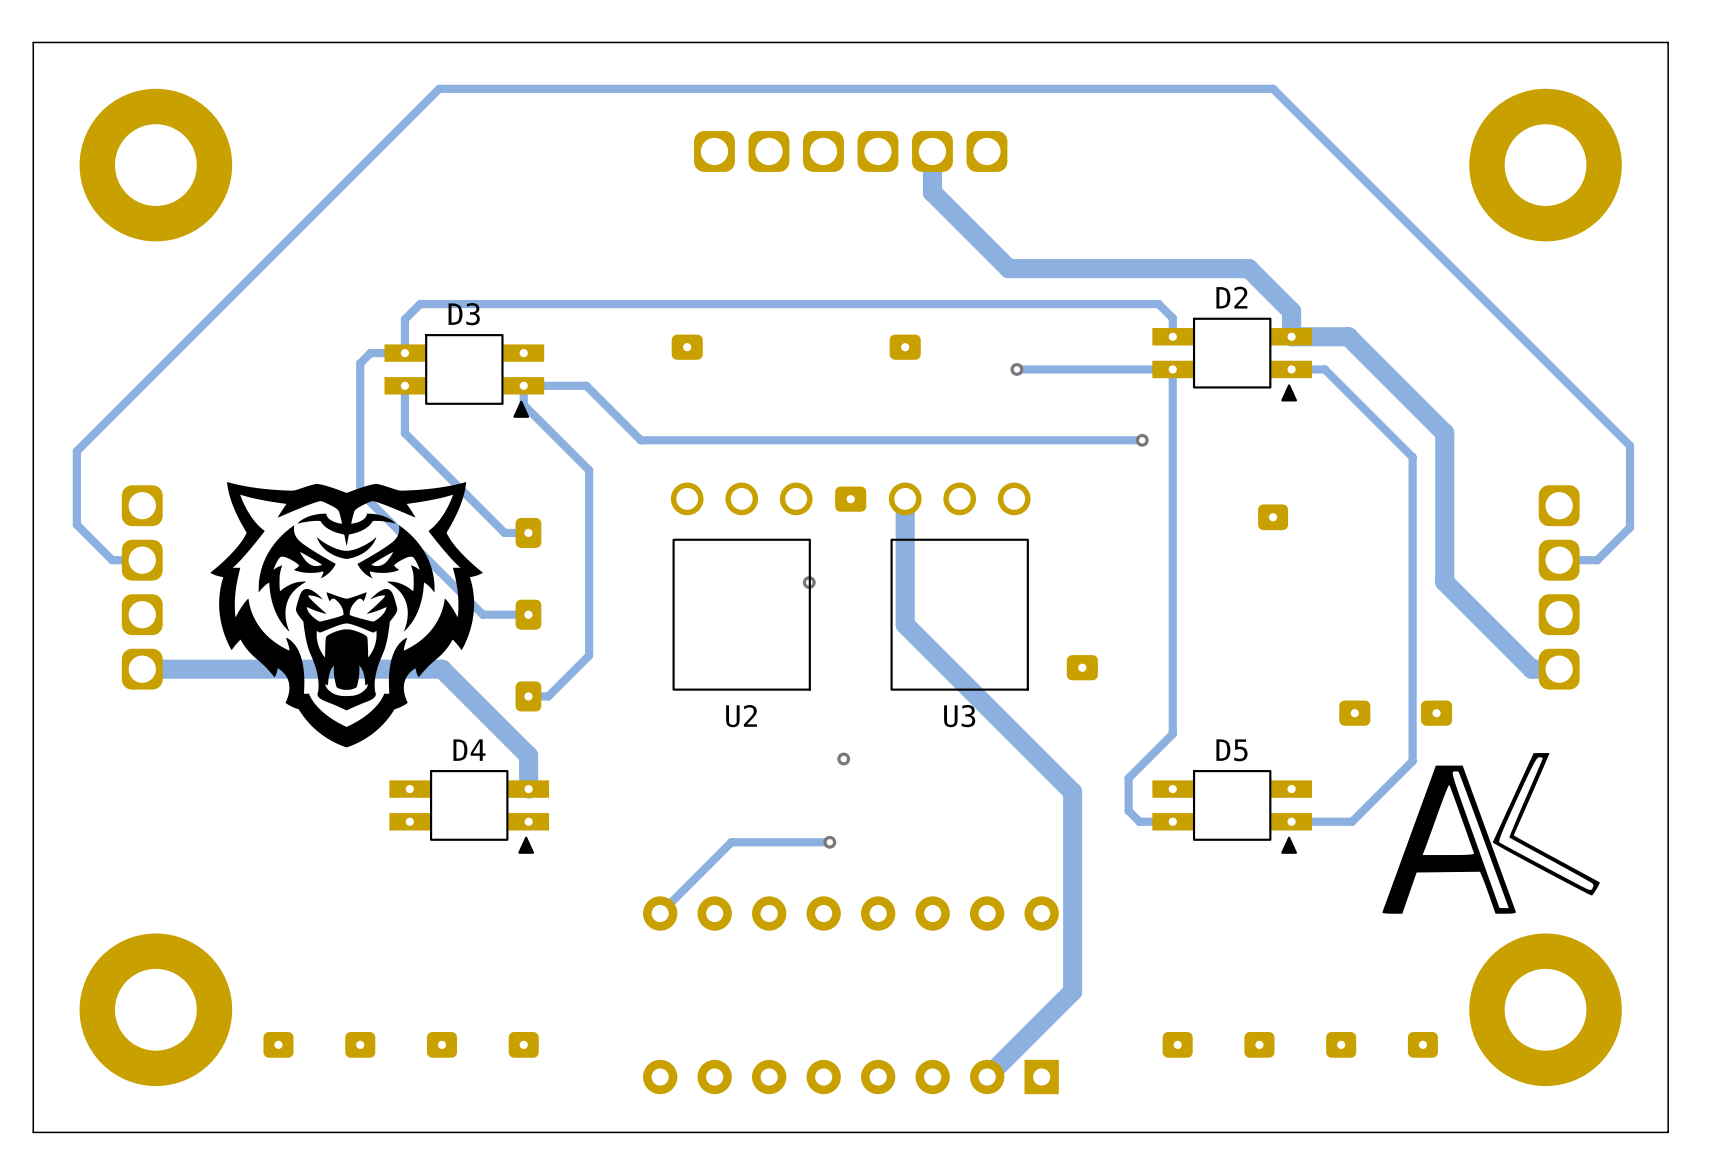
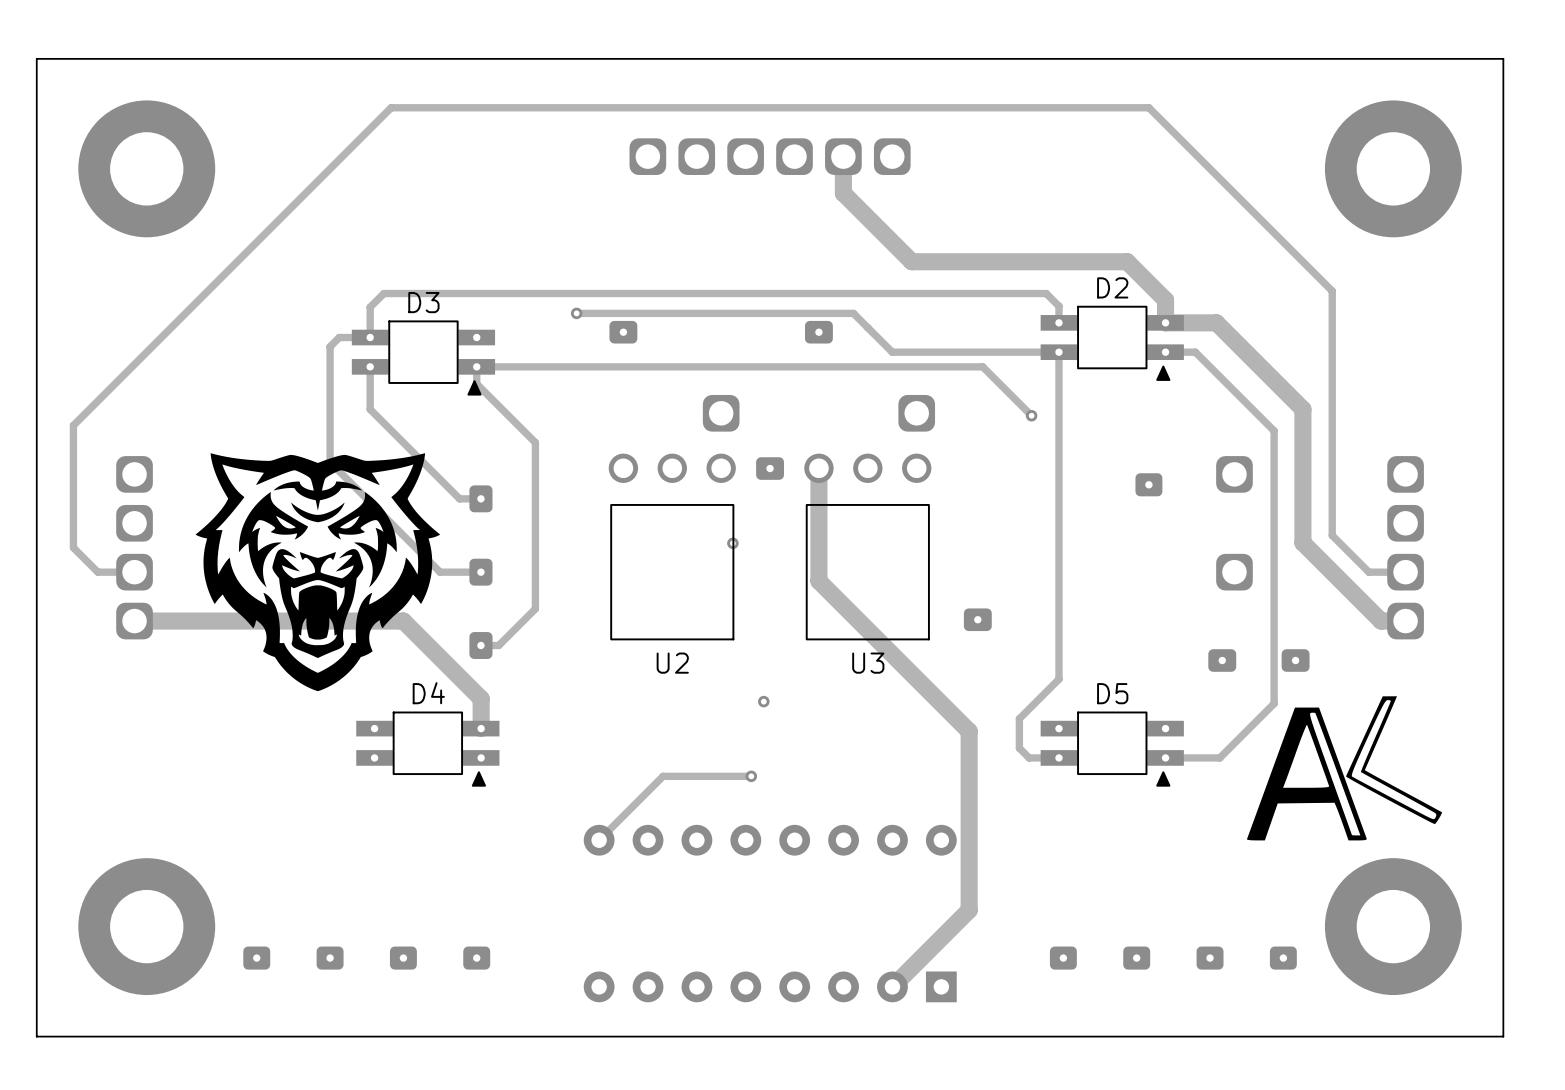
track: none -> (576, 313) (853, 313) (892, 352) (919, 352)
via: none -> (576, 313)
via: (1016, 369) -> none
track: (586, 385) (640, 440) (1142, 440) -> (532, 366) (982, 366) (1031, 415)
part: none -> (721, 413)
part: none -> (916, 413)
part: none -> (1234, 474)
track: (1559, 560) (1597, 560) (1630, 527) (1630, 445) (1273, 88) (439, 88) (76, 451) (76, 524) (112, 560) (142, 560) -> none
part: none -> (1234, 572)
track: none -> (1405, 572) (1368, 572) (1332, 535) (1332, 291) (1148, 107) (391, 107) (73, 425) (73, 547) (97, 572) (134, 572)

